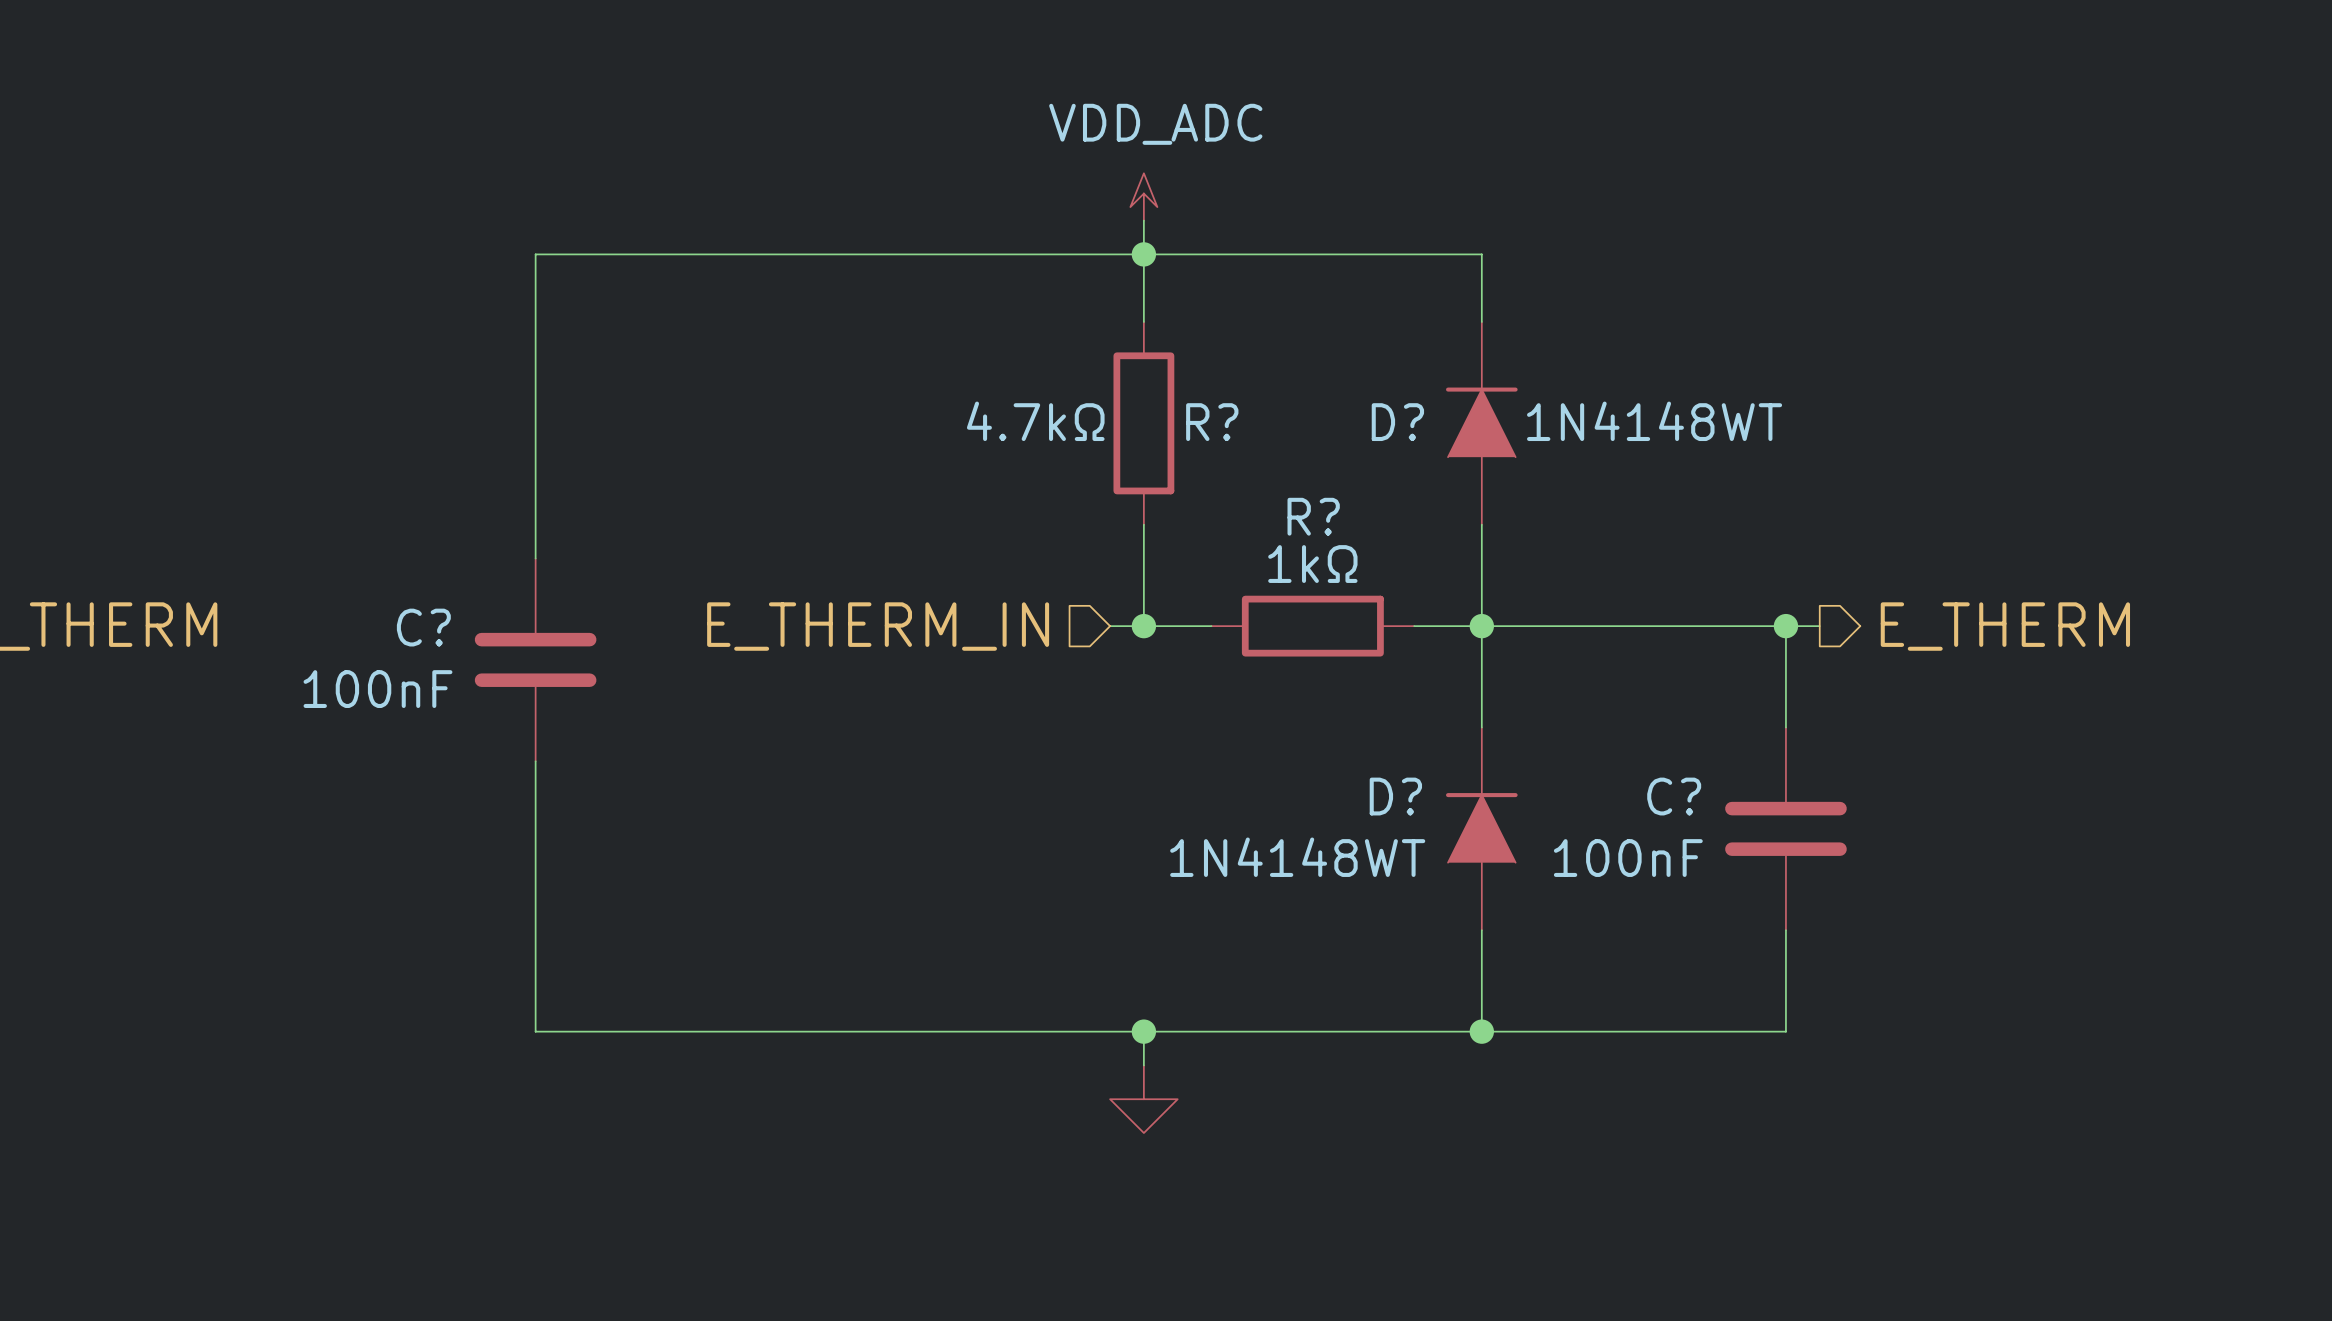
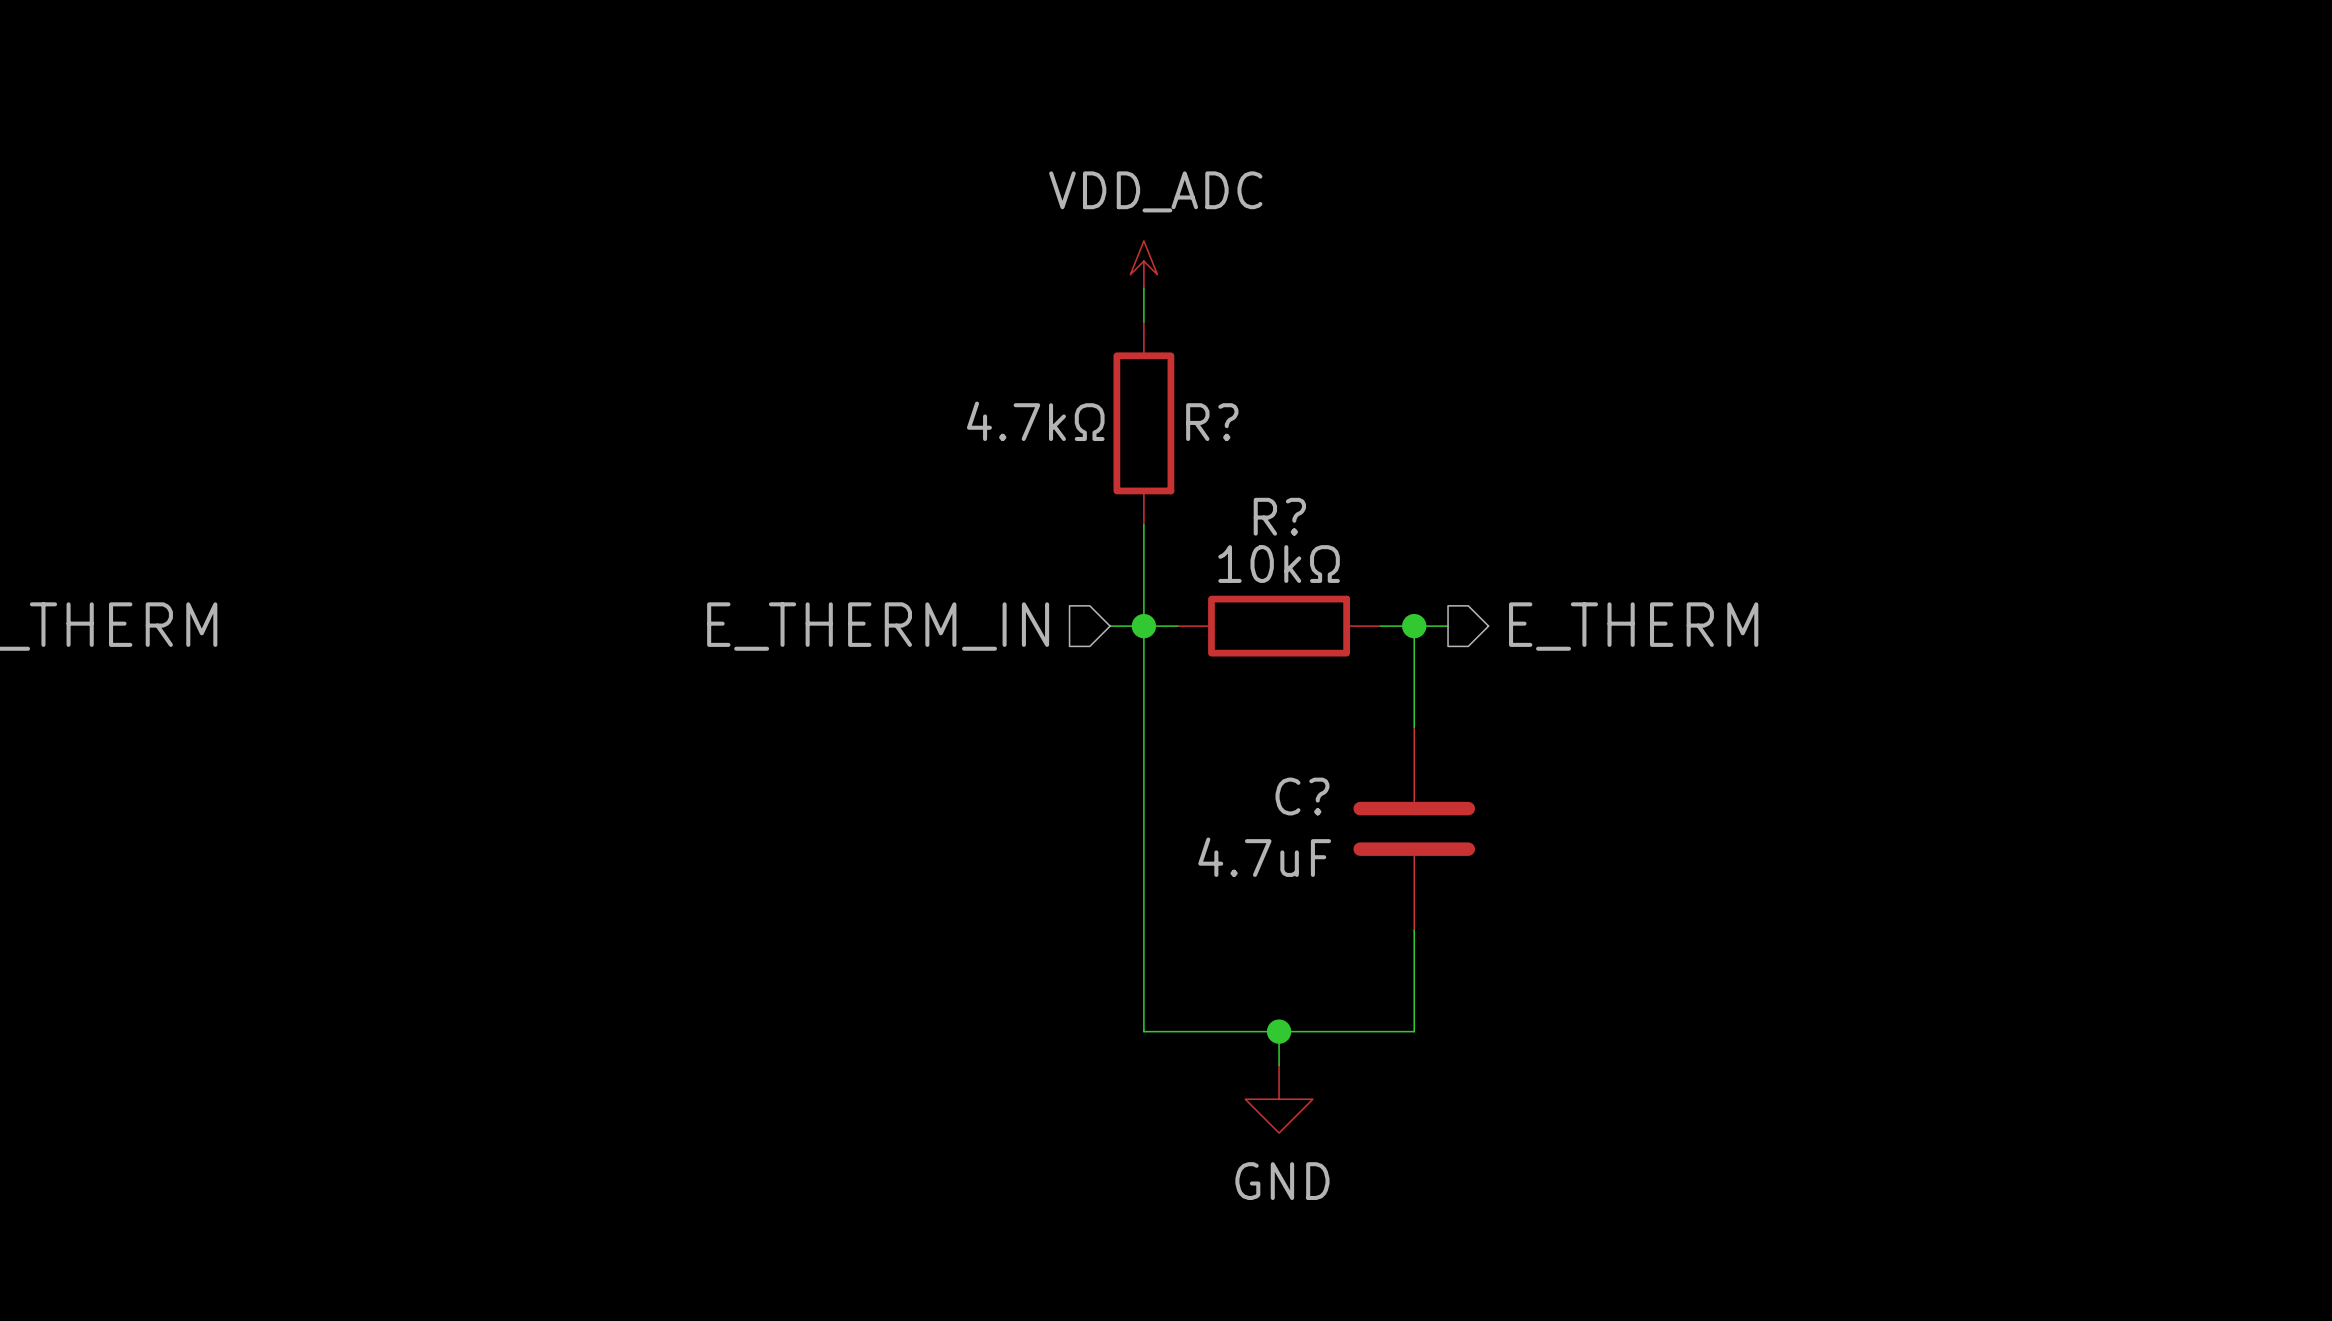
power symbol position: VDD_ADC (1143, 196) -> VDD_ADC (1143, 264)
wire: (1143, 220) (1143, 288) -> none
junction: (1143, 254) -> none
wire: (1481, 321) (1481, 254) (535, 254) (535, 558) -> none
D?: 1N4148WT (1481, 423) -> none
wire: (1481, 524) (1481, 727) -> none
wire: none -> (1143, 626) (1143, 1031)
R?: none -> 10kΩ (1279, 626)
R?: 1kΩ (1312, 626) -> none
wire: none -> (1380, 626) (1414, 626) (1414, 727)
wire: (1448, 626) (1819, 626) -> none
junction position: (1481, 626) -> (1414, 626)
wire: (1785, 626) (1785, 727) -> none
junction: (1785, 626) -> none
hierarchical label position: E_THERM (2005, 626) -> E_THERM (1633, 626)
C?: 100nF (535, 659) -> none
wire: (535, 761) (535, 1031) (1143, 1031) (1143, 1065) -> none
C?: none -> 4.7uF (1414, 828)
D?: 1N4148WT (1481, 828) -> none
C?: 100nF (1785, 828) -> none
wire: (1481, 930) (1481, 1031) -> none
wire: (1785, 930) (1785, 1031) (1414, 1031) -> (1414, 930) (1414, 1031)
junction: (1143, 1031) -> none
wire: none -> (1279, 1031) (1279, 1065)
junction: none -> (1279, 1031)
junction: (1481, 1031) -> none
power symbol: (1143, 1099) -> none
power symbol: none -> GND (1279, 1099)

